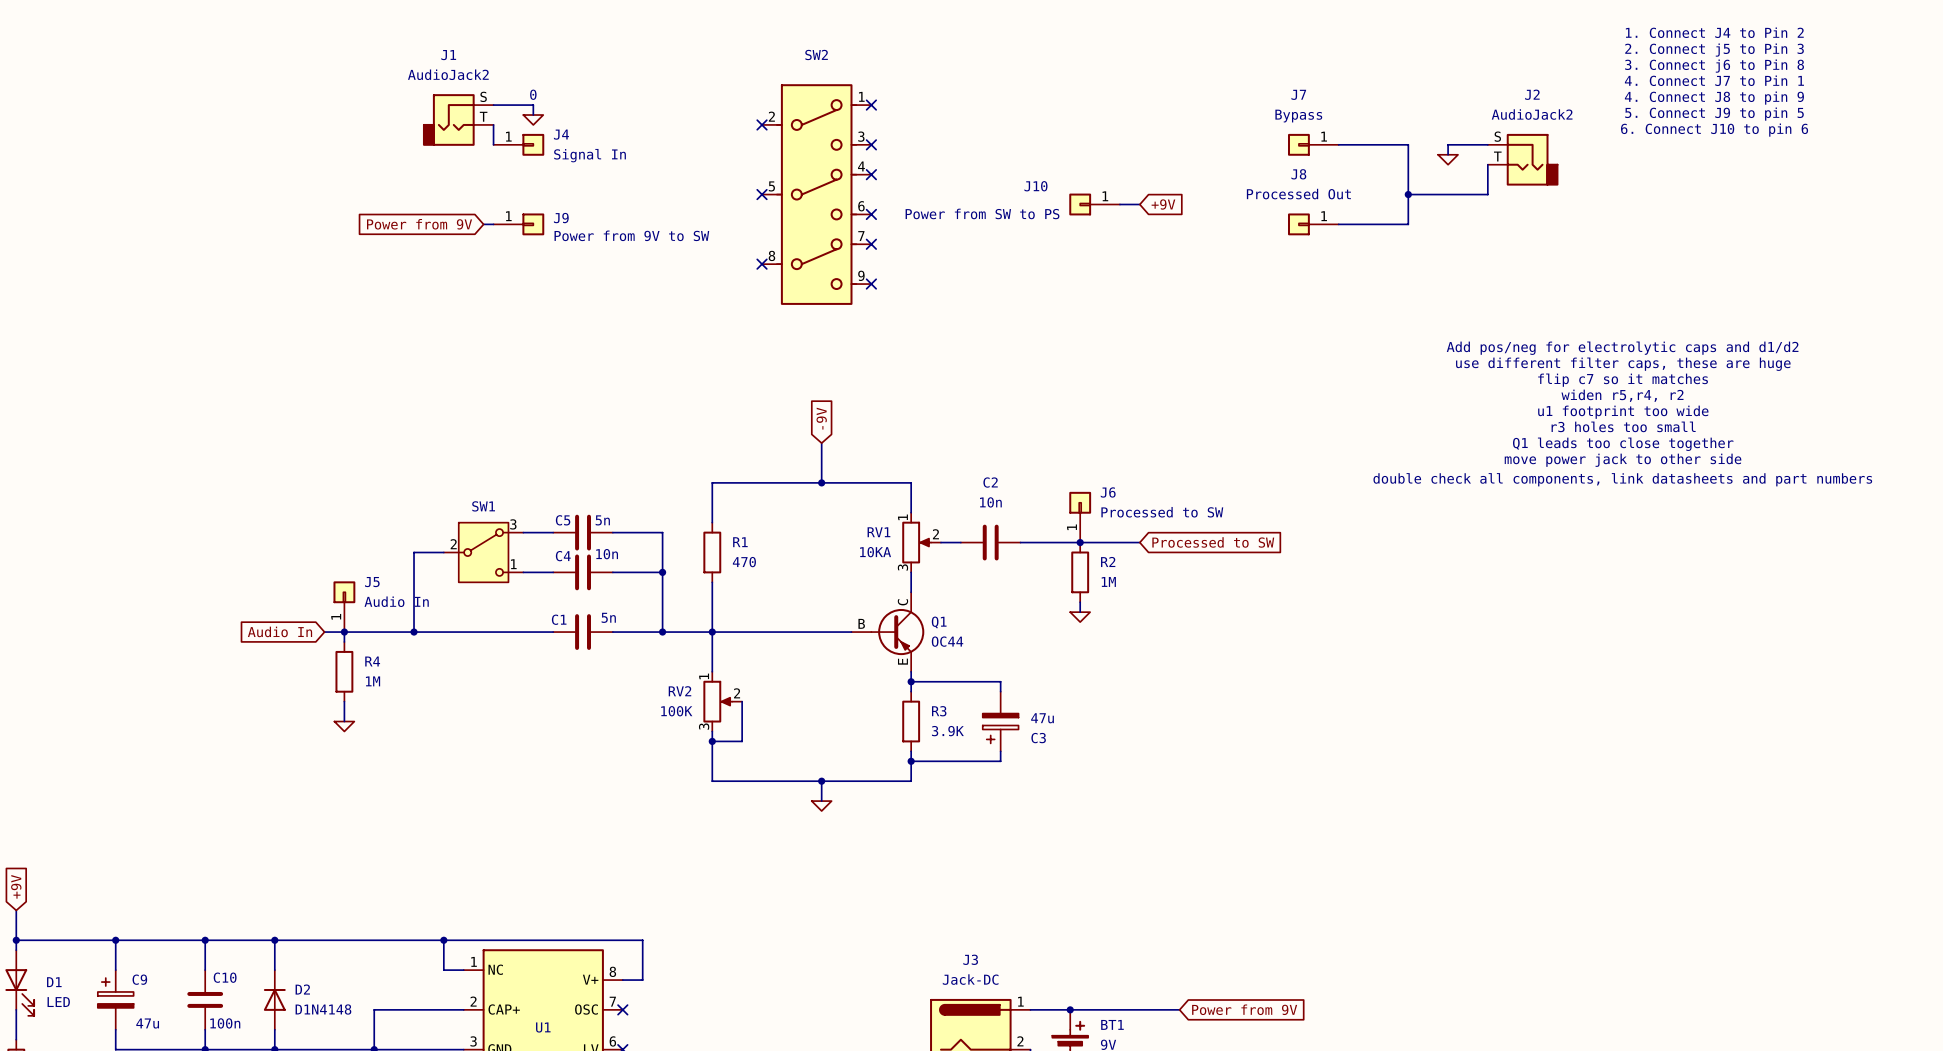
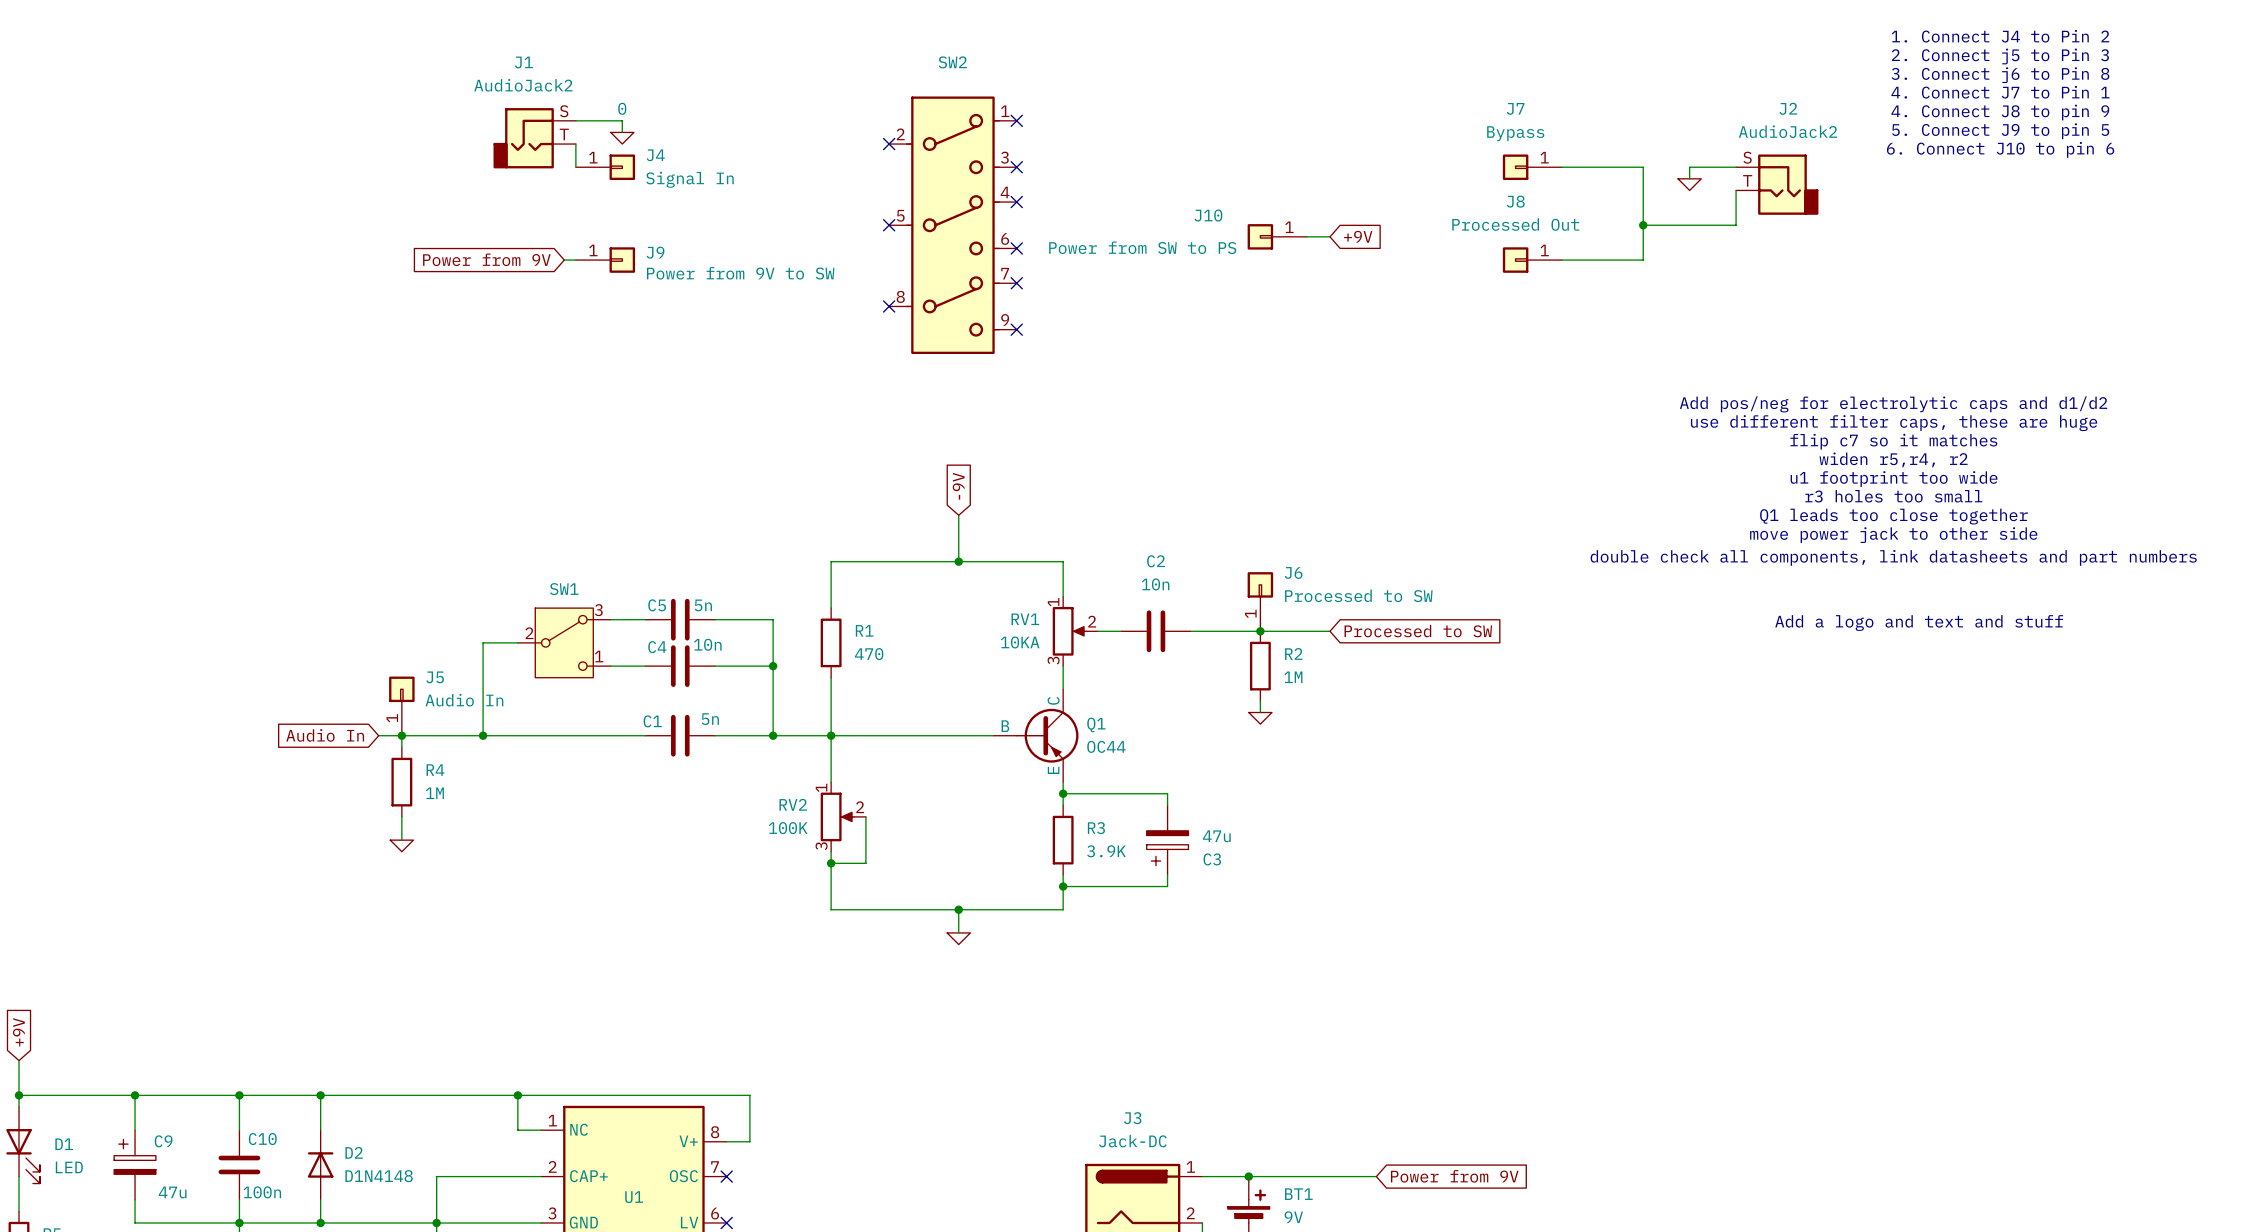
text: none -> Add a logo and text and stuff (1919, 623)

